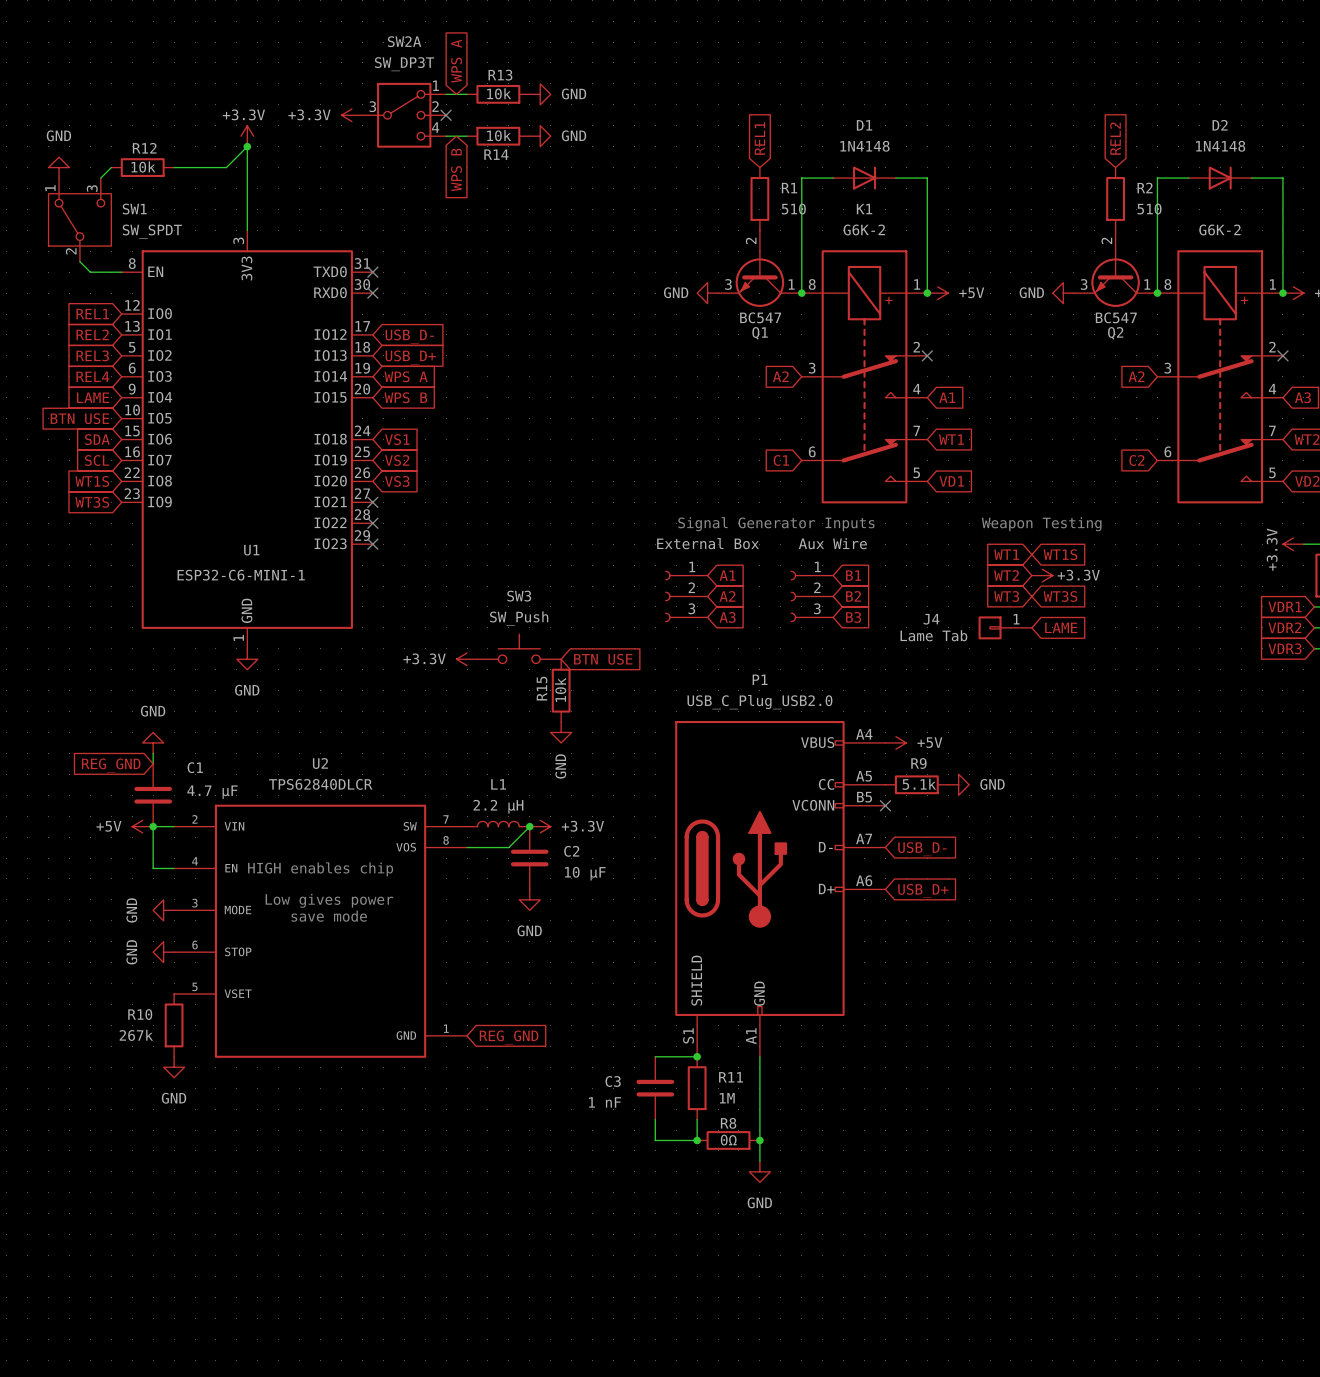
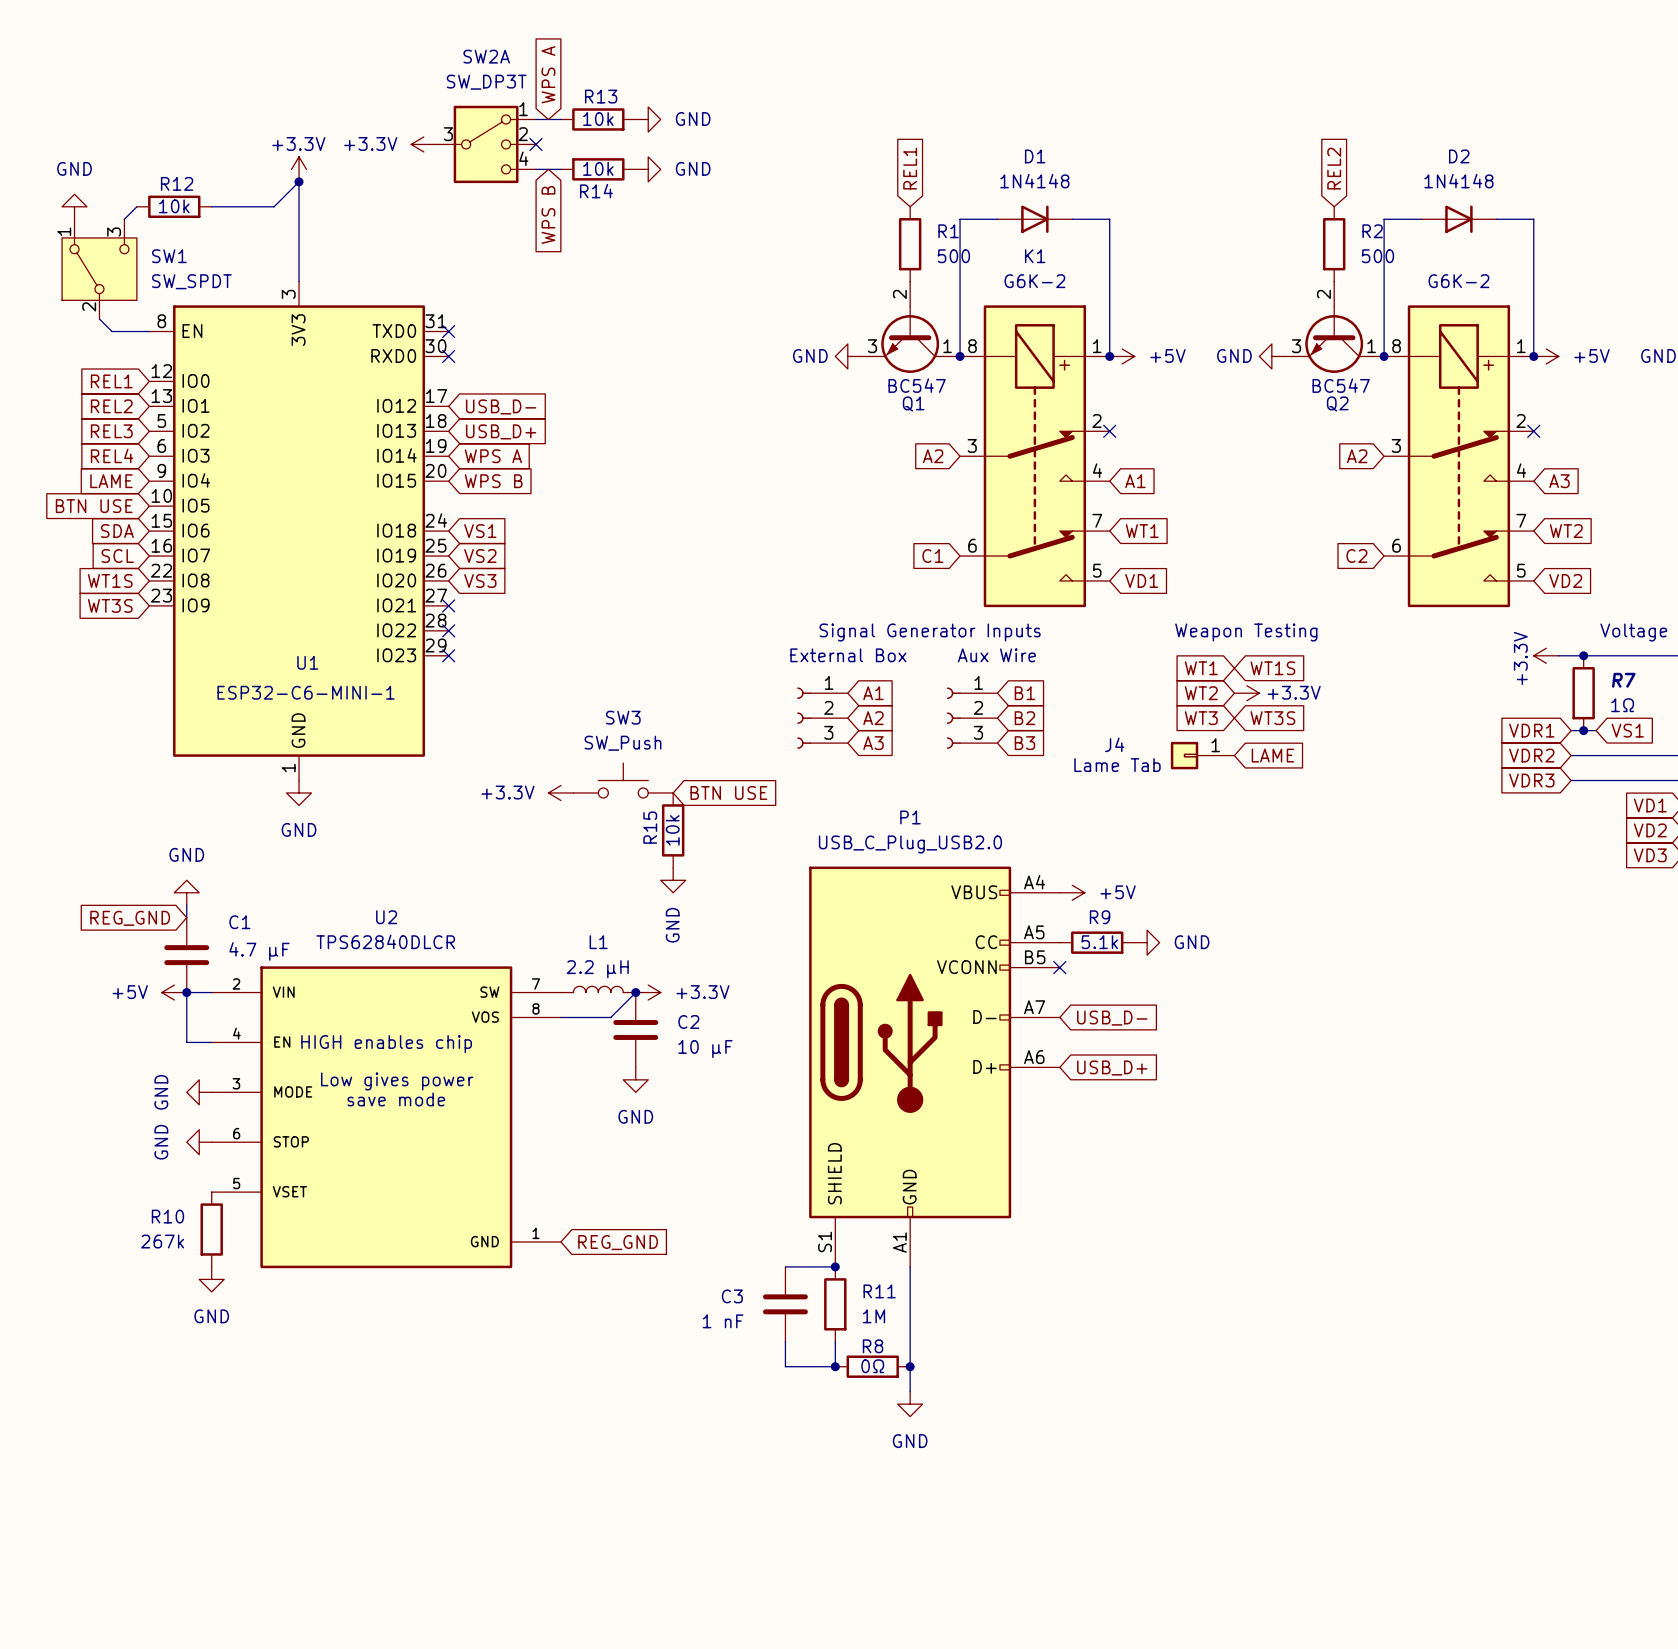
R1 value: 510 (793, 209) -> 500 (953, 256)
R2 value: 510 (1149, 209) -> 500 (1377, 256)

